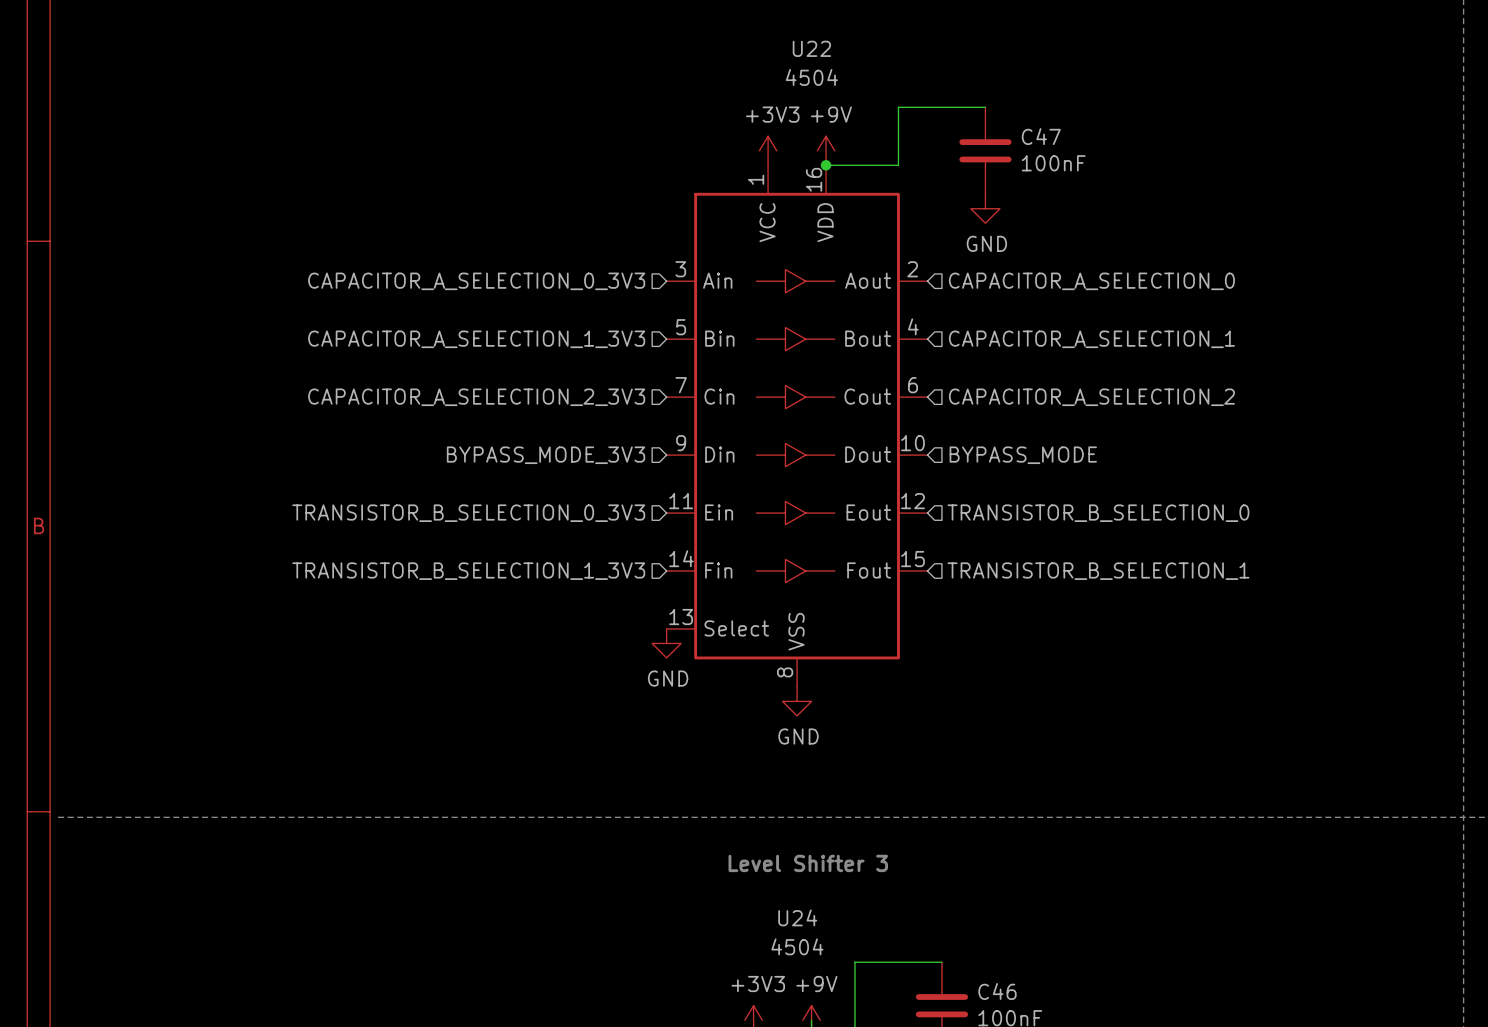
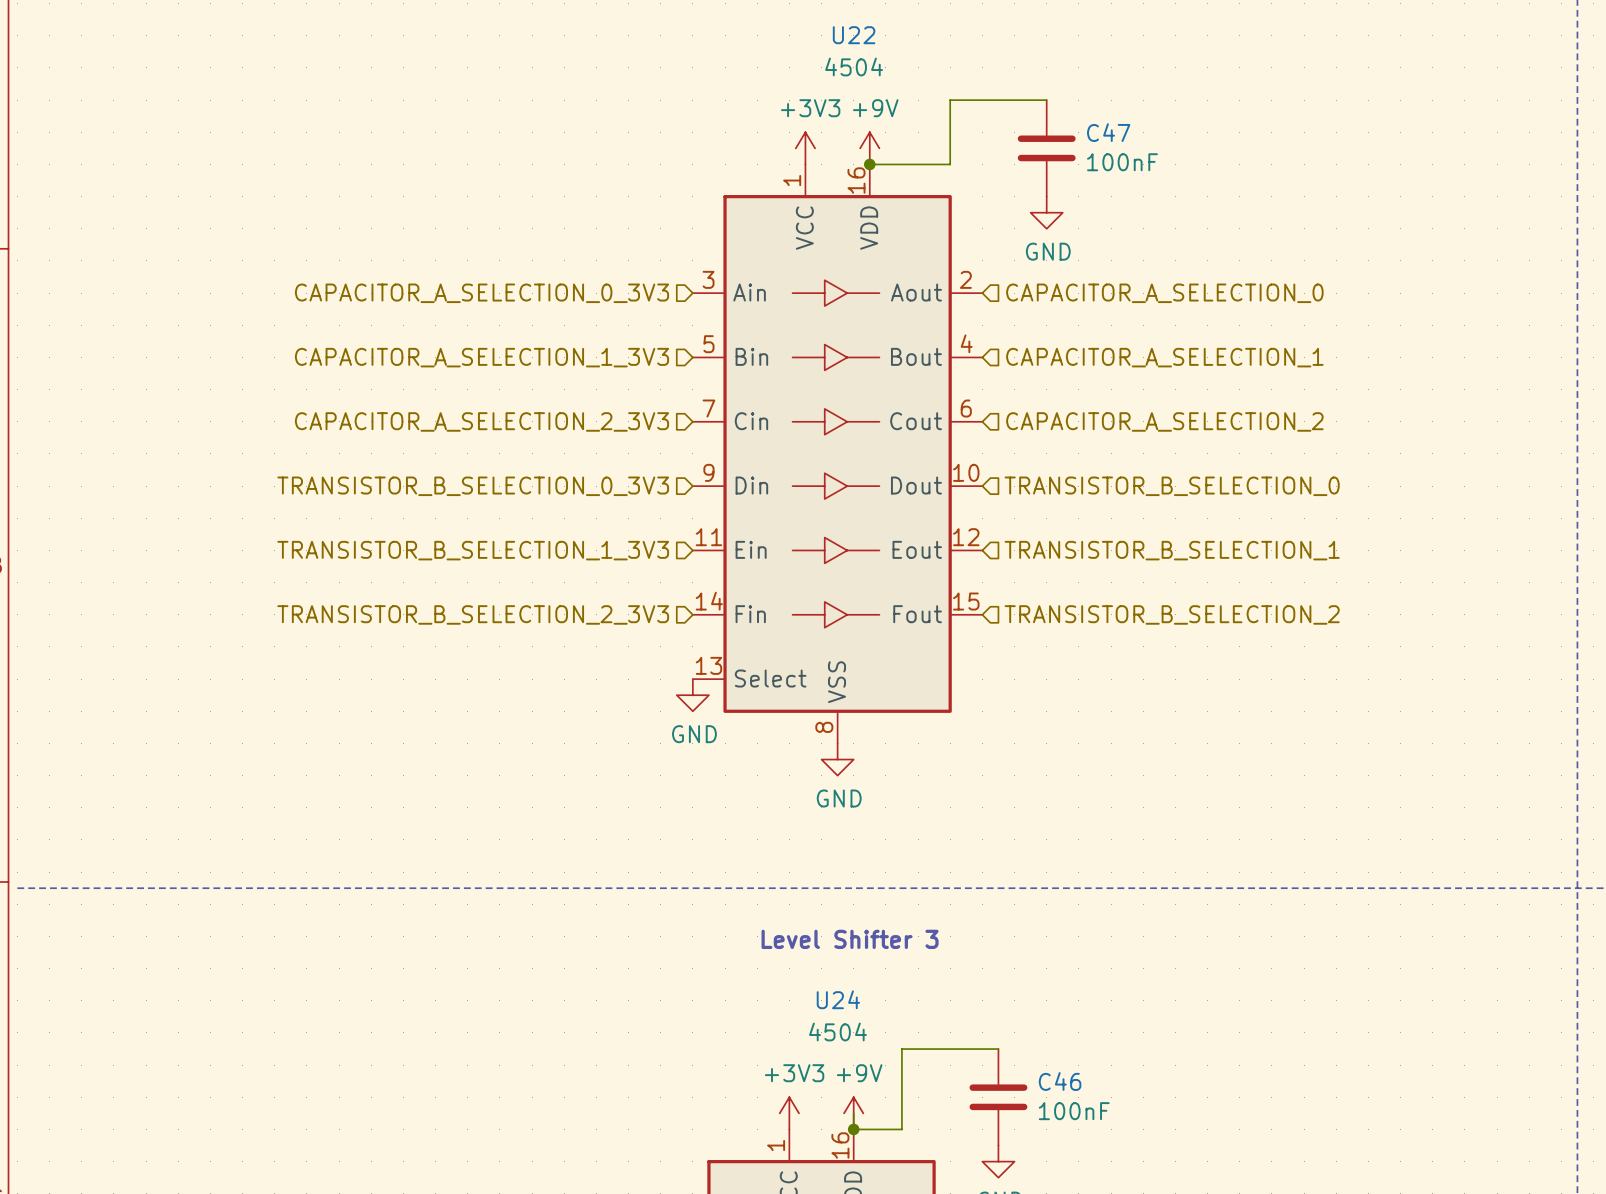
hierarchical label: BYPASS_MODE_3V3 (546, 455) -> TRANSISTOR_B_SELECTION_0_3V3 (473, 486)
hierarchical label: BYPASS_MODE (1023, 455) -> TRANSISTOR_B_SELECTION_0 (1172, 486)
hierarchical label: TRANSISTOR_B_SELECTION_0_3V3 (468, 513) -> TRANSISTOR_B_SELECTION_1_3V3 (473, 550)
hierarchical label: TRANSISTOR_B_SELECTION_0 (1098, 513) -> TRANSISTOR_B_SELECTION_1 (1172, 550)
hierarchical label: TRANSISTOR_B_SELECTION_1_3V3 (468, 571) -> TRANSISTOR_B_SELECTION_2_3V3 (473, 614)
hierarchical label: TRANSISTOR_B_SELECTION_1 (1098, 571) -> TRANSISTOR_B_SELECTION_2 (1172, 614)

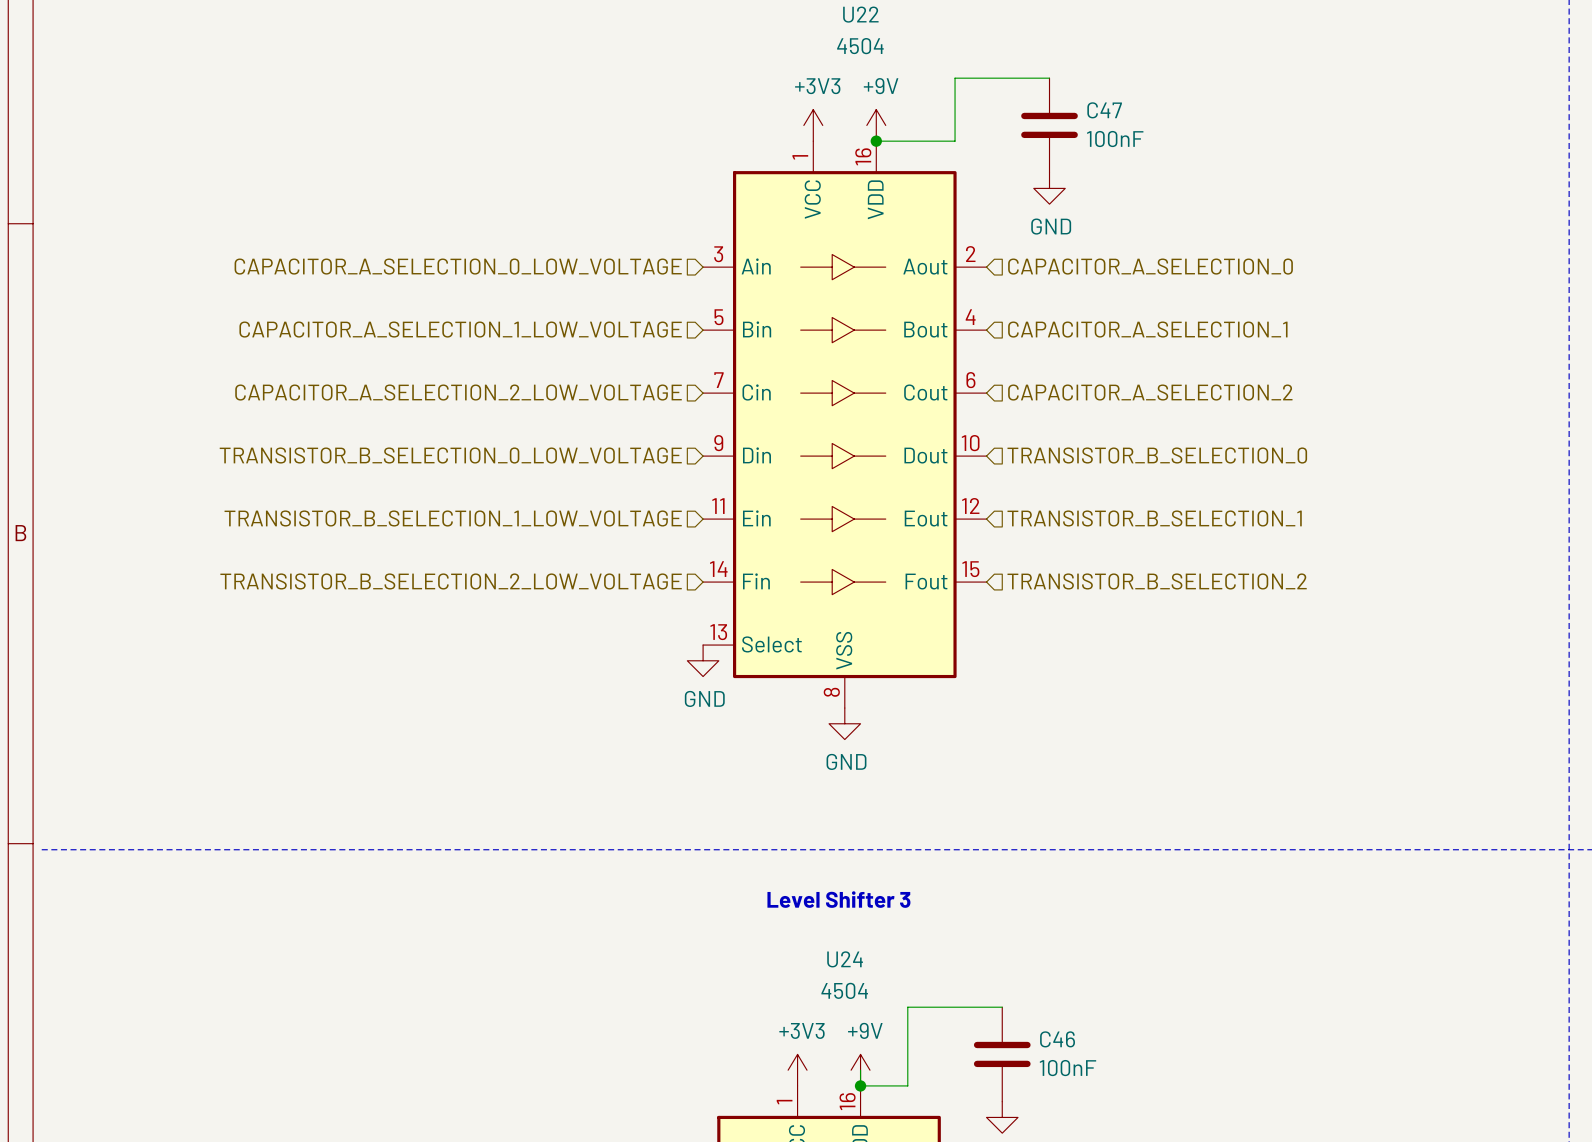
hierarchical label: CAPACITOR_A_SELECTION_0_3V3 (482, 293) -> CAPACITOR_A_SELECTION_0_LOW_VOLTAGE (458, 266)
hierarchical label: CAPACITOR_A_SELECTION_1_3V3 (482, 357) -> CAPACITOR_A_SELECTION_1_LOW_VOLTAGE (460, 329)
hierarchical label: CAPACITOR_A_SELECTION_2_3V3 (482, 421) -> CAPACITOR_A_SELECTION_2_LOW_VOLTAGE (458, 392)
hierarchical label: TRANSISTOR_B_SELECTION_0_3V3 (473, 486) -> TRANSISTOR_B_SELECTION_0_LOW_VOLTAGE (450, 455)
hierarchical label: TRANSISTOR_B_SELECTION_1_3V3 (473, 550) -> TRANSISTOR_B_SELECTION_1_LOW_VOLTAGE (453, 518)
hierarchical label: TRANSISTOR_B_SELECTION_2_3V3 (473, 614) -> TRANSISTOR_B_SELECTION_2_LOW_VOLTAGE (451, 581)

